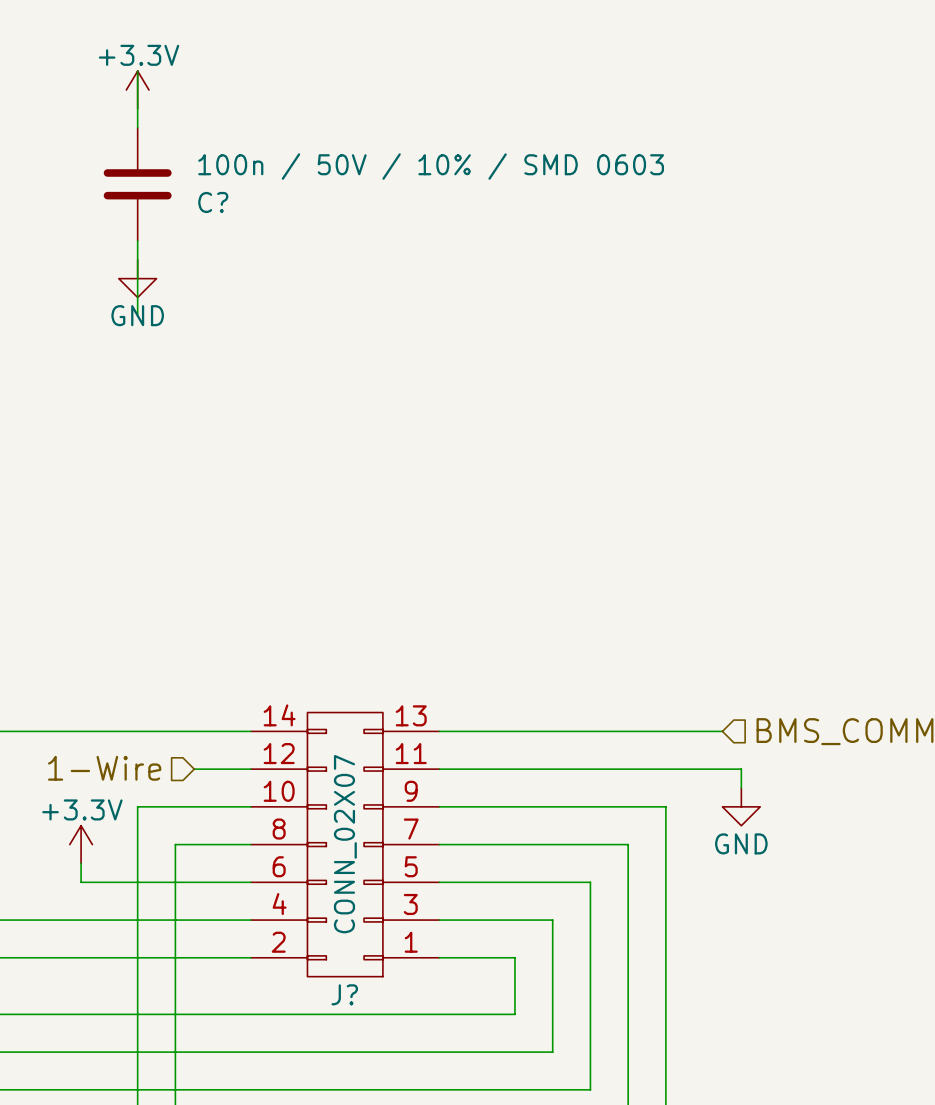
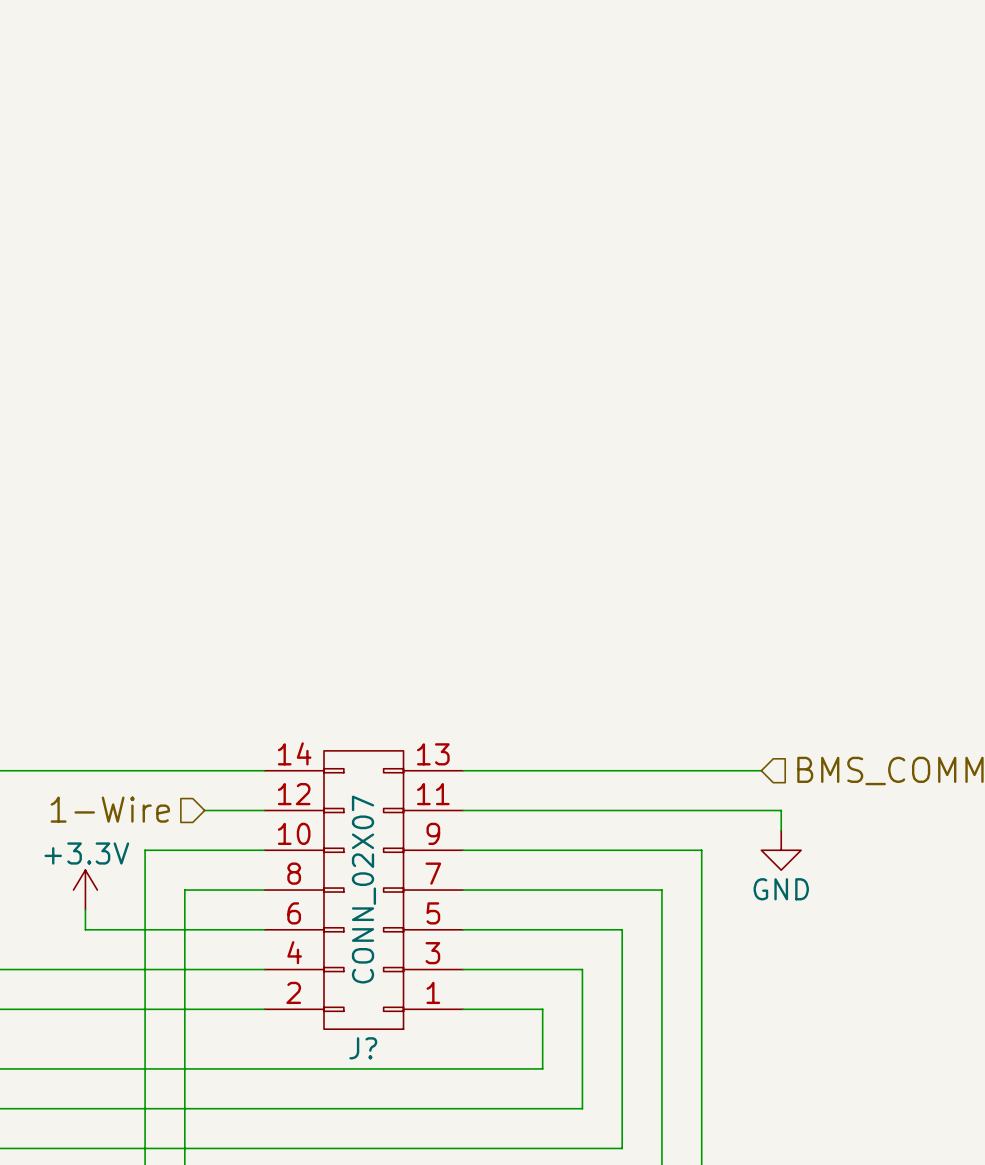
wire: (137, 71) (137, 127) -> none
power symbol: +3.3V (137, 89) -> none
C?: 100n / 50V / 10% / SMD 0603 (137, 184) -> none
wire: (137, 240) (137, 316) -> none
power symbol: GND (137, 278) -> none

